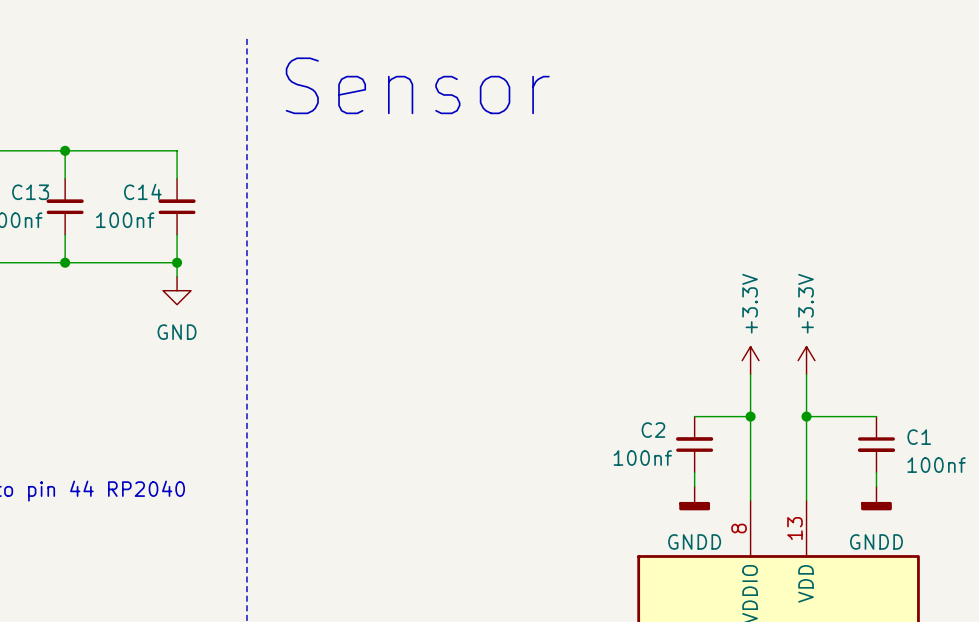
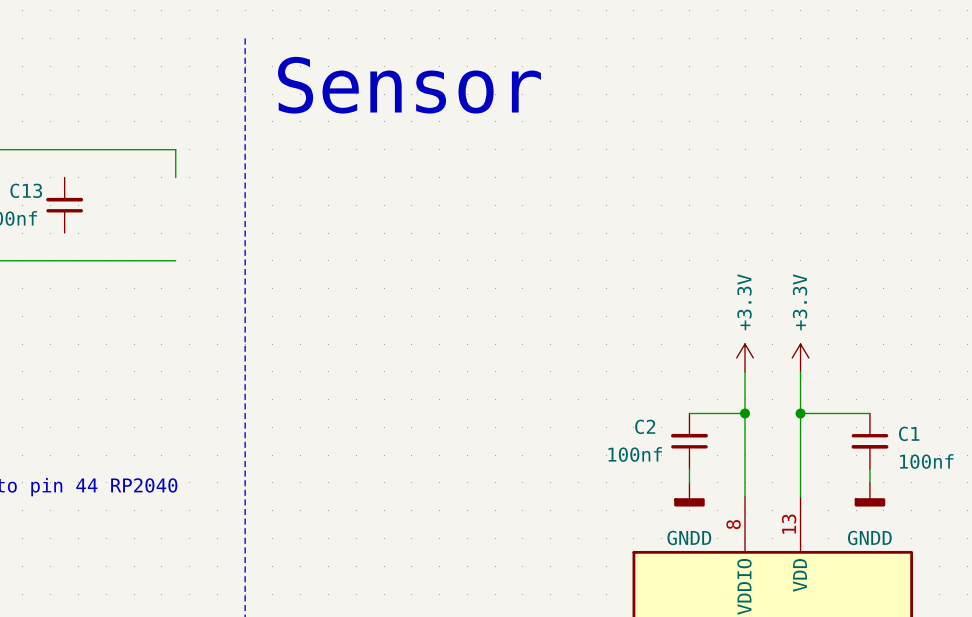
wire: (65, 150) (65, 178) -> none
junction: (65, 150) -> none
C14: 100nf (177, 206) -> none
wire: (65, 234) (65, 262) -> none
wire: (177, 234) (177, 276) -> none
junction: (65, 262) -> none
junction: (177, 262) -> none
power symbol: GND (177, 290) -> none

